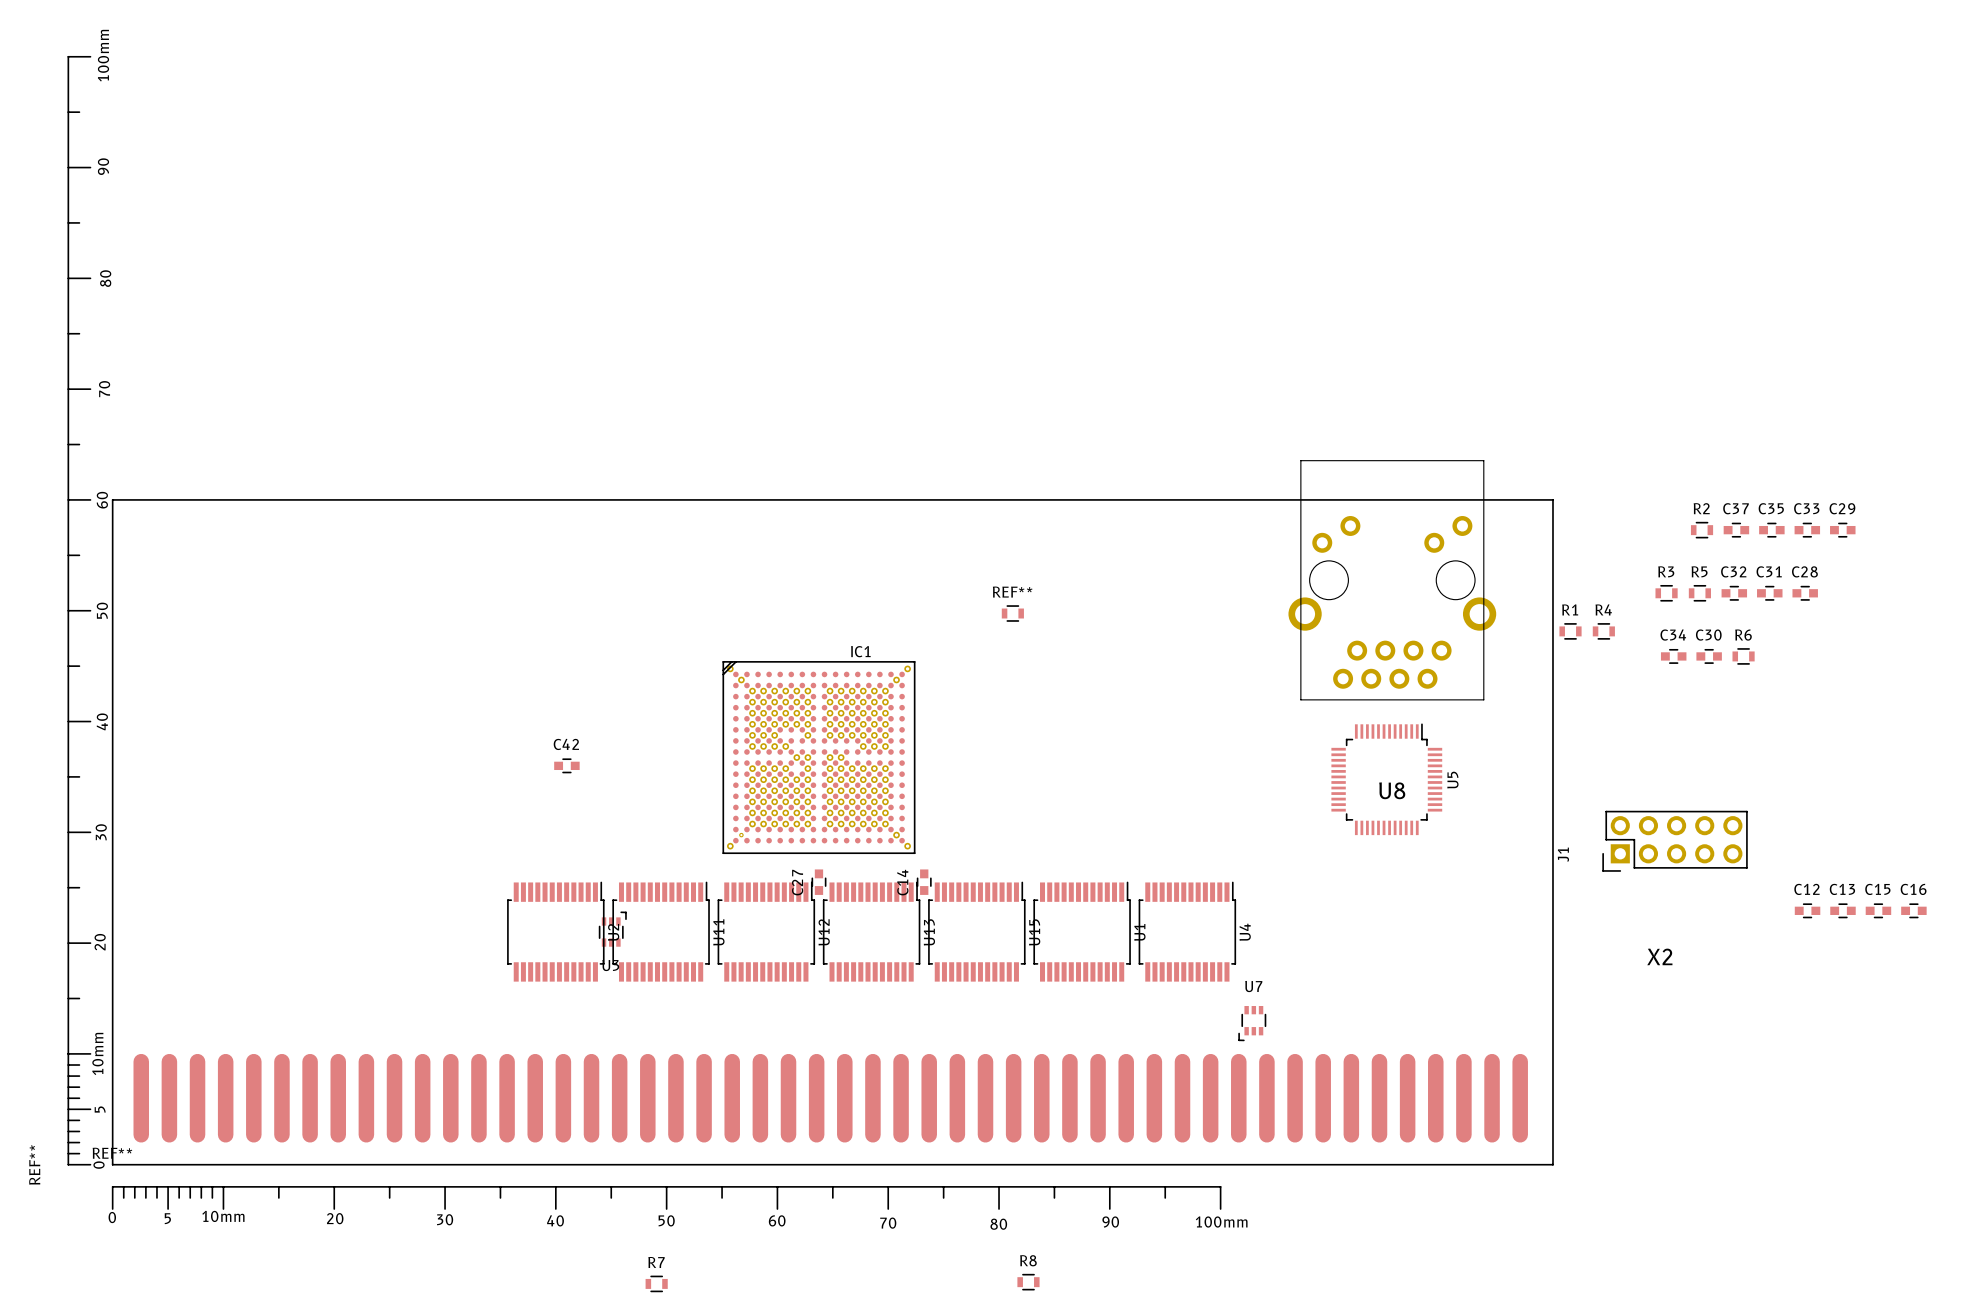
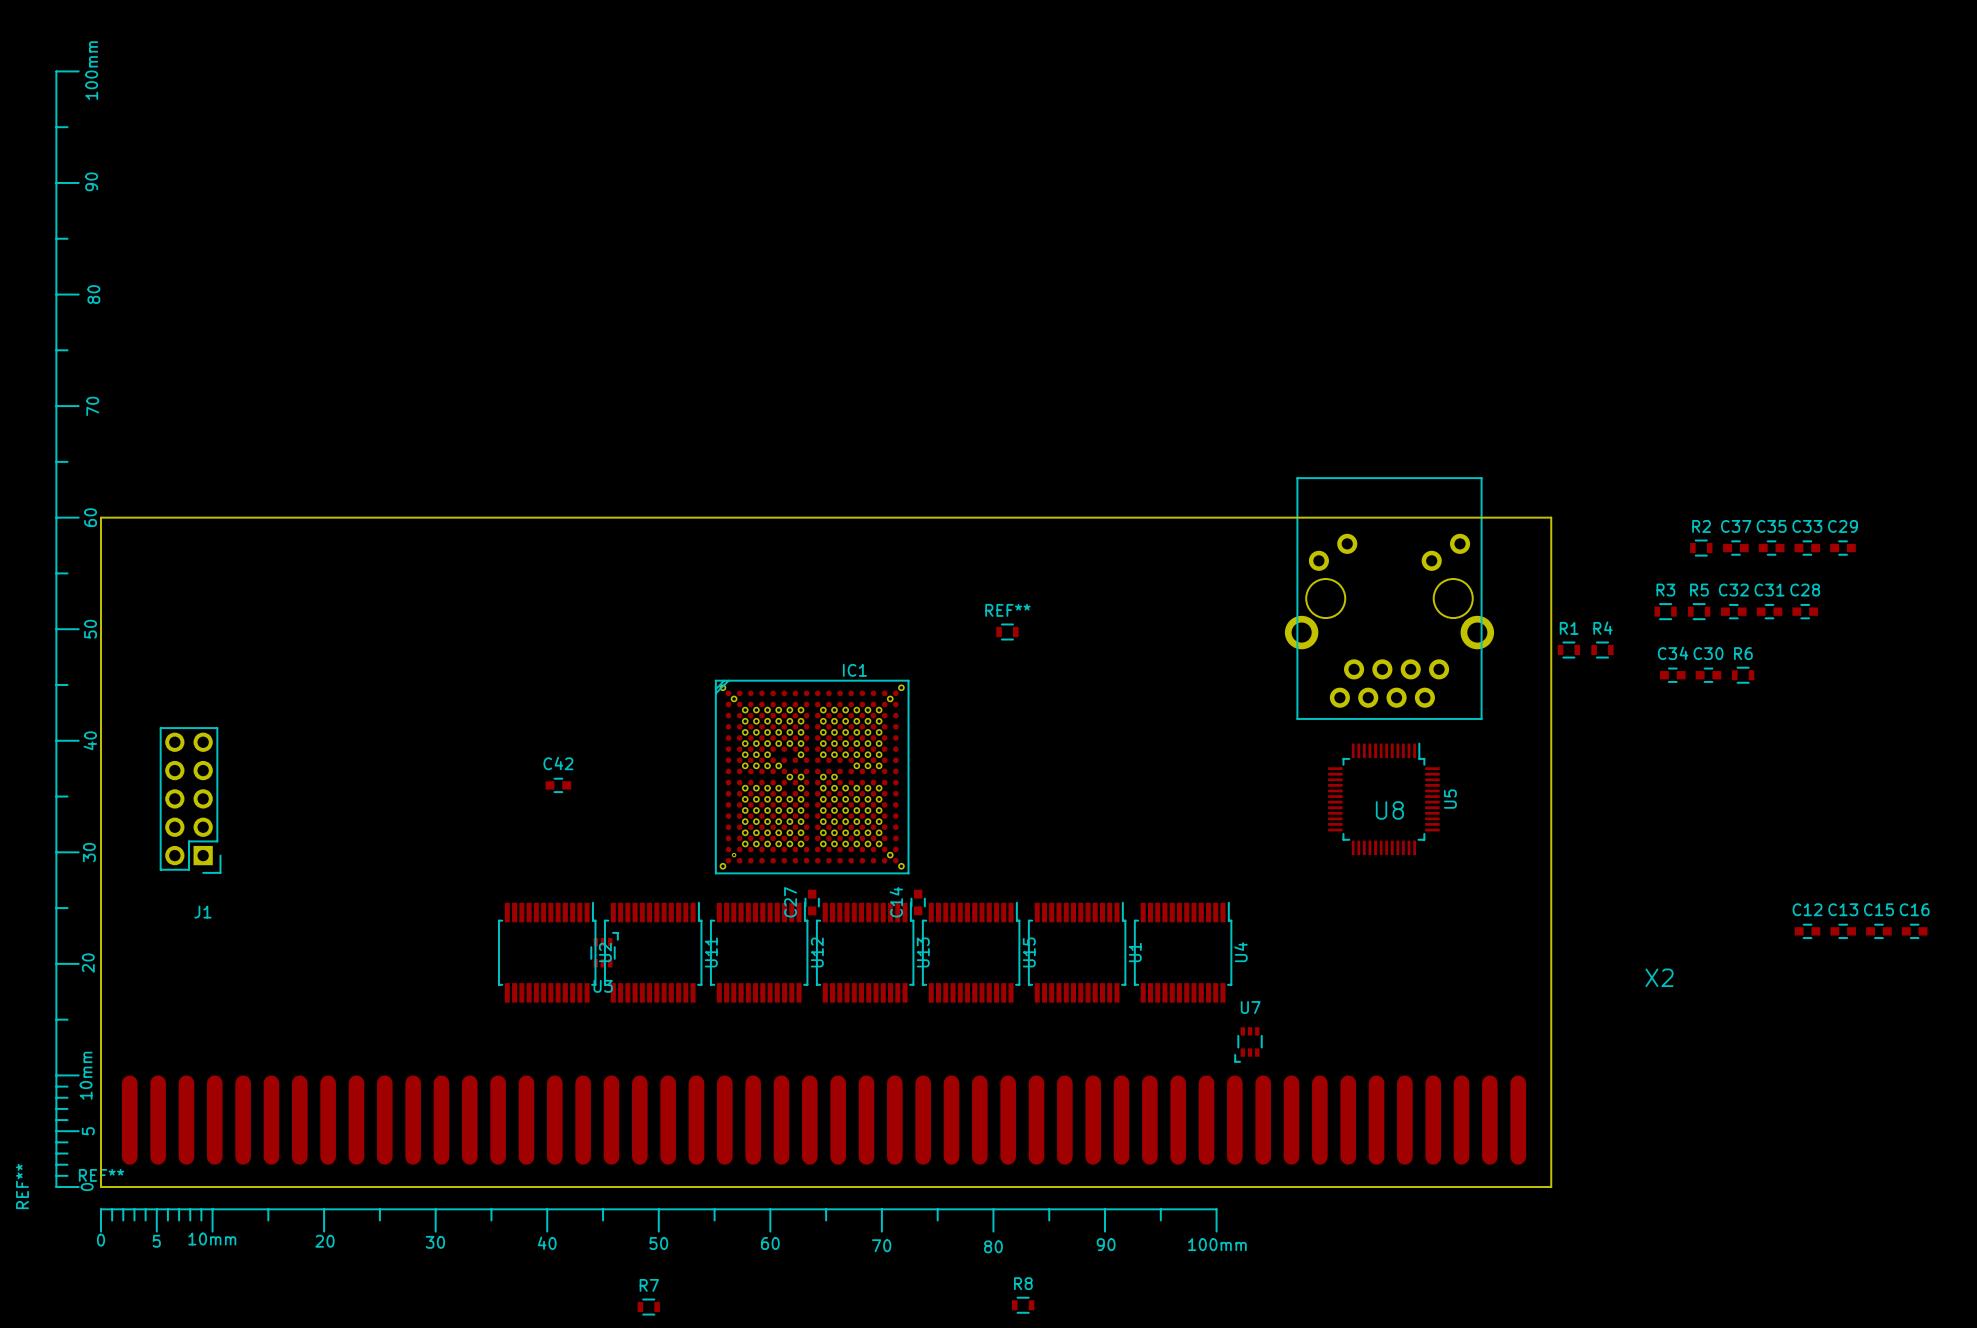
J1 rotation: 0° (1675, 841) -> 90° counterclockwise (190, 800)
J1 position: (1675, 841) -> (190, 800)

